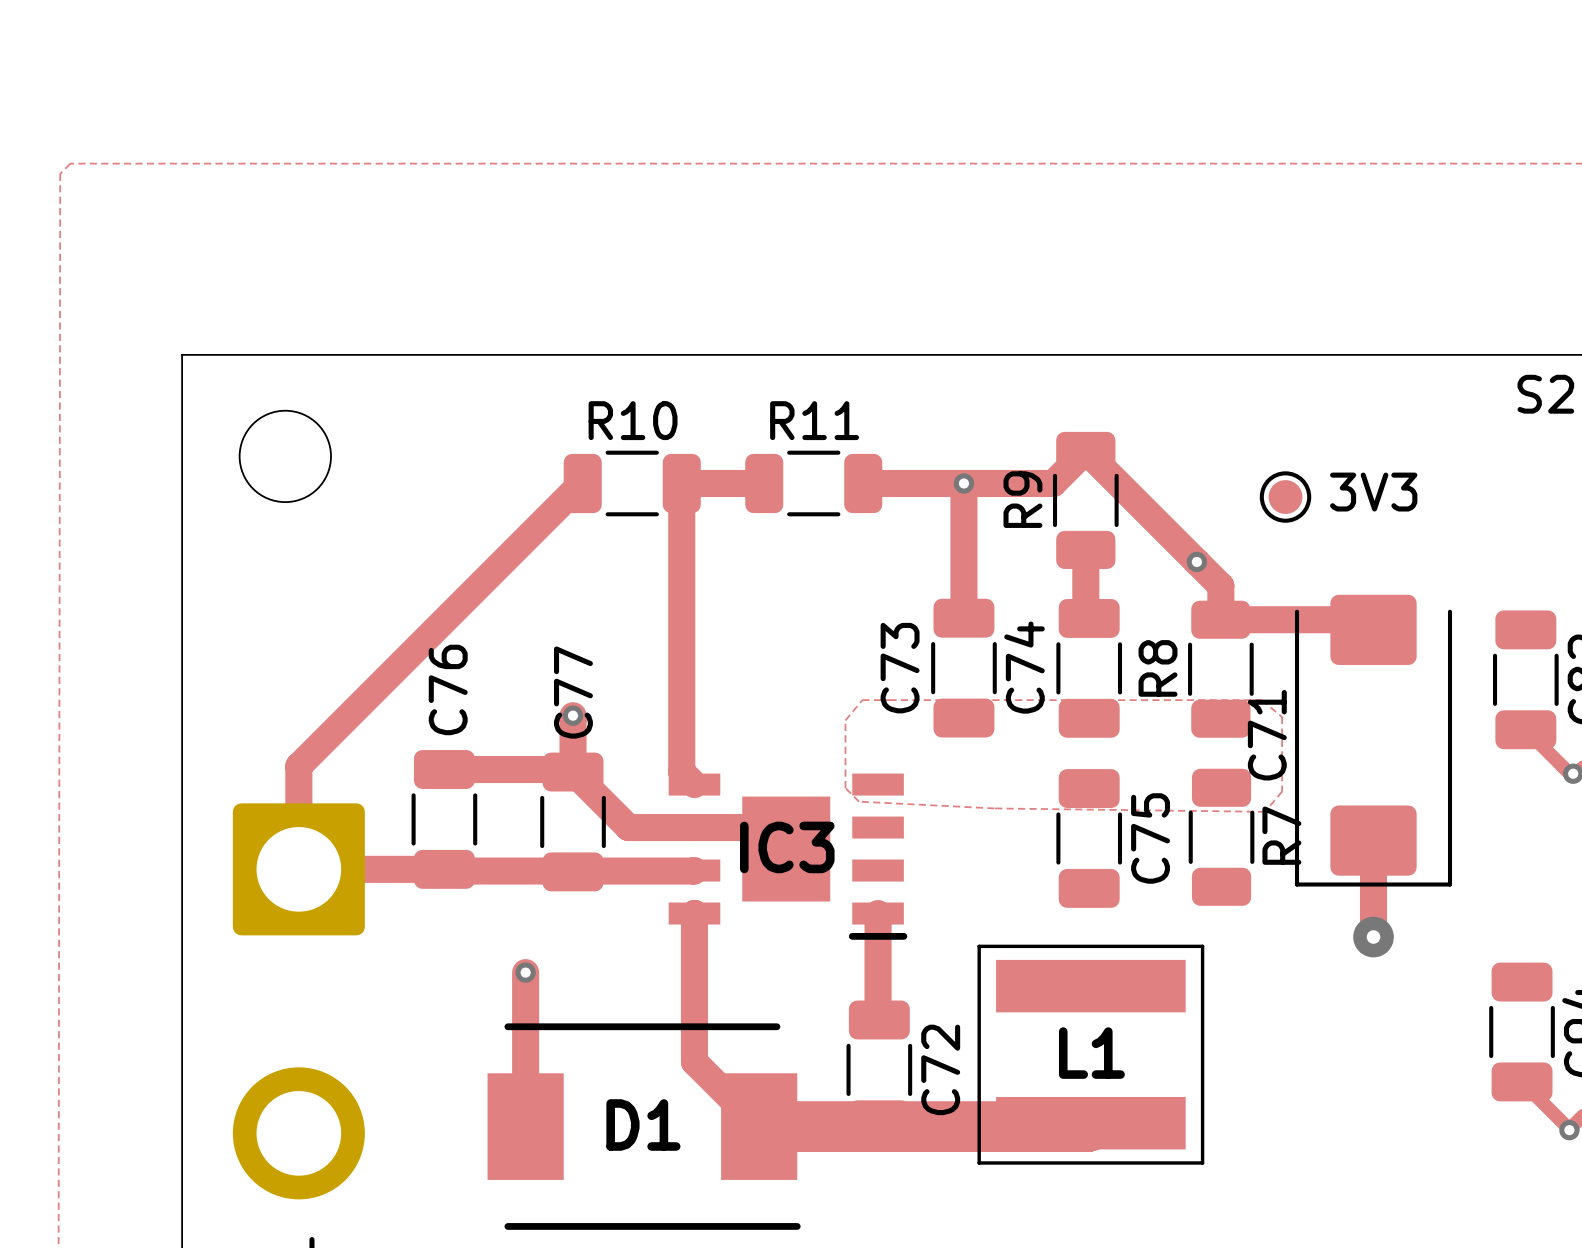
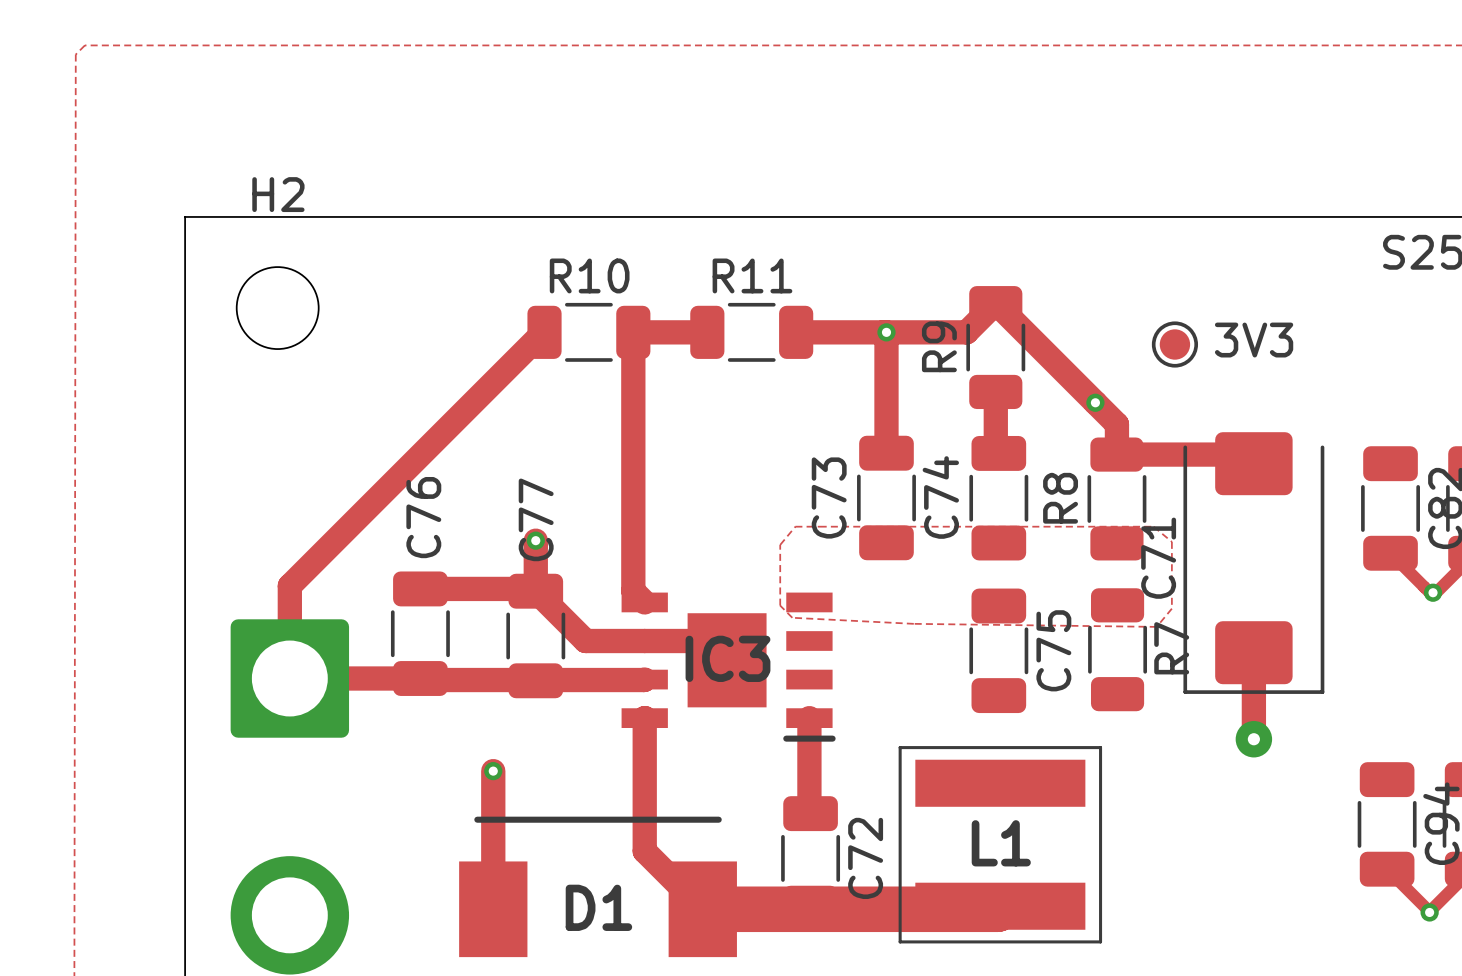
H2 name: none -> H2 (278, 194)

